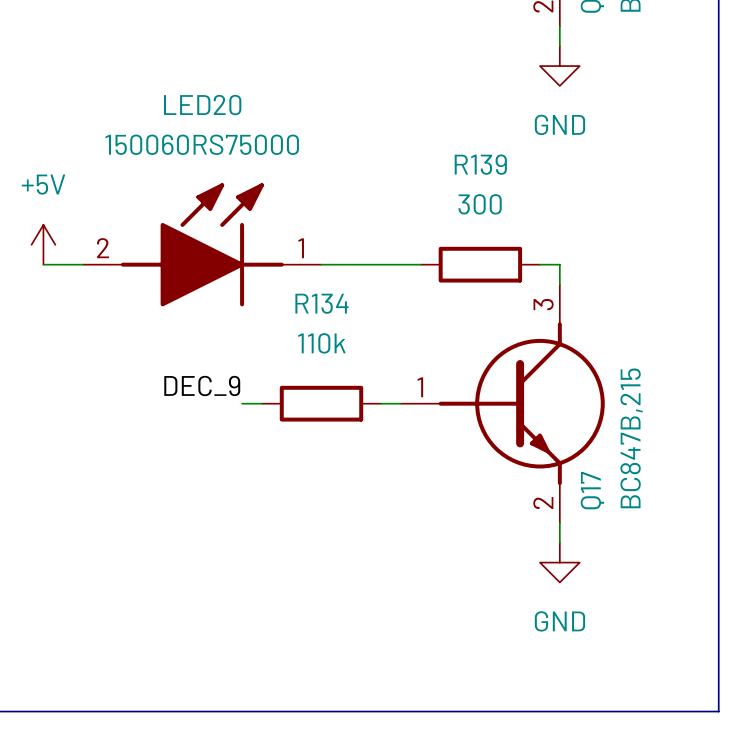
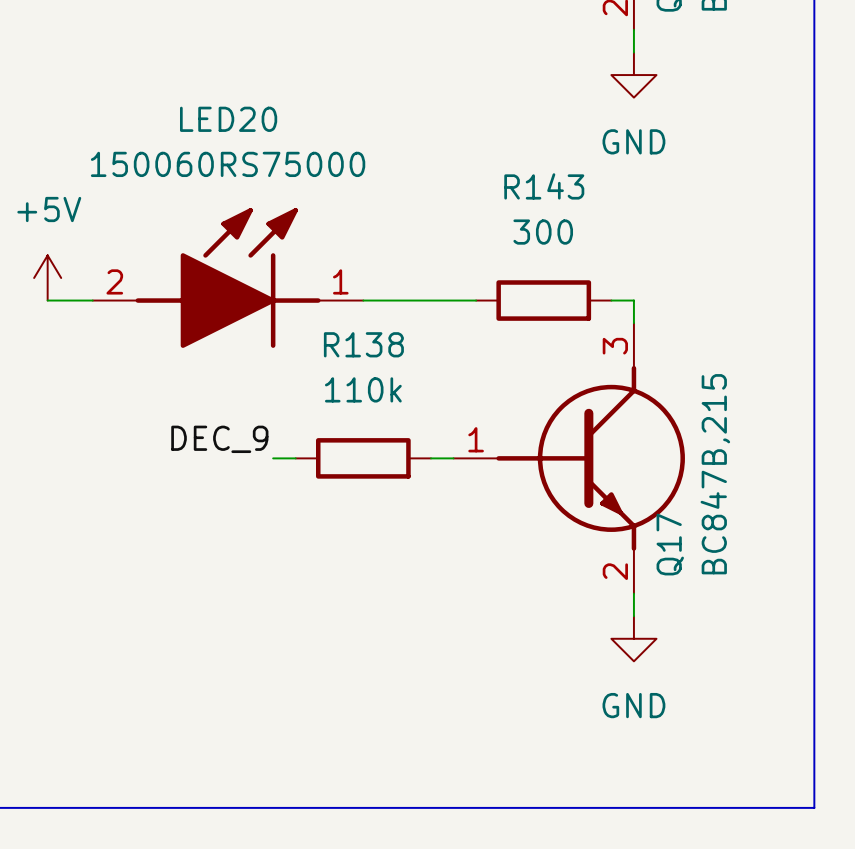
R139 name: R139 (480, 164) -> R143 (544, 186)
R134 name: R134 (321, 303) -> R138 (363, 344)

